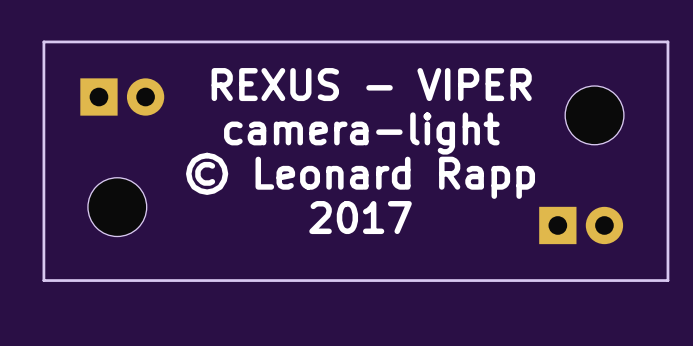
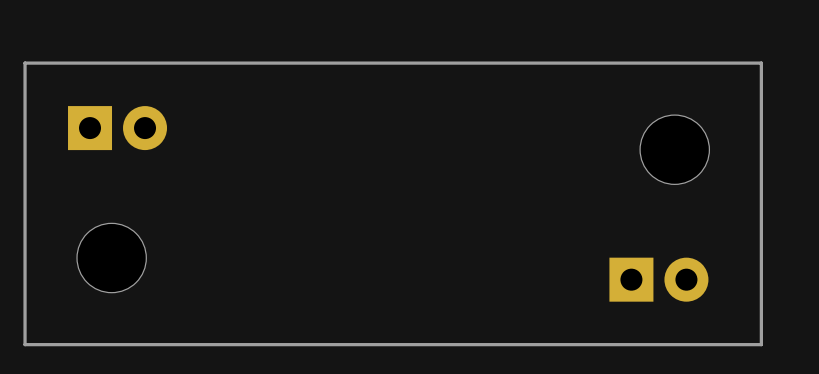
text: REXUS - VIPER (371, 84) -> none
text: camera-light (361, 133) -> none
text: © Leonard Rapp (360, 175) -> none
text: 2017 (360, 217) -> none

